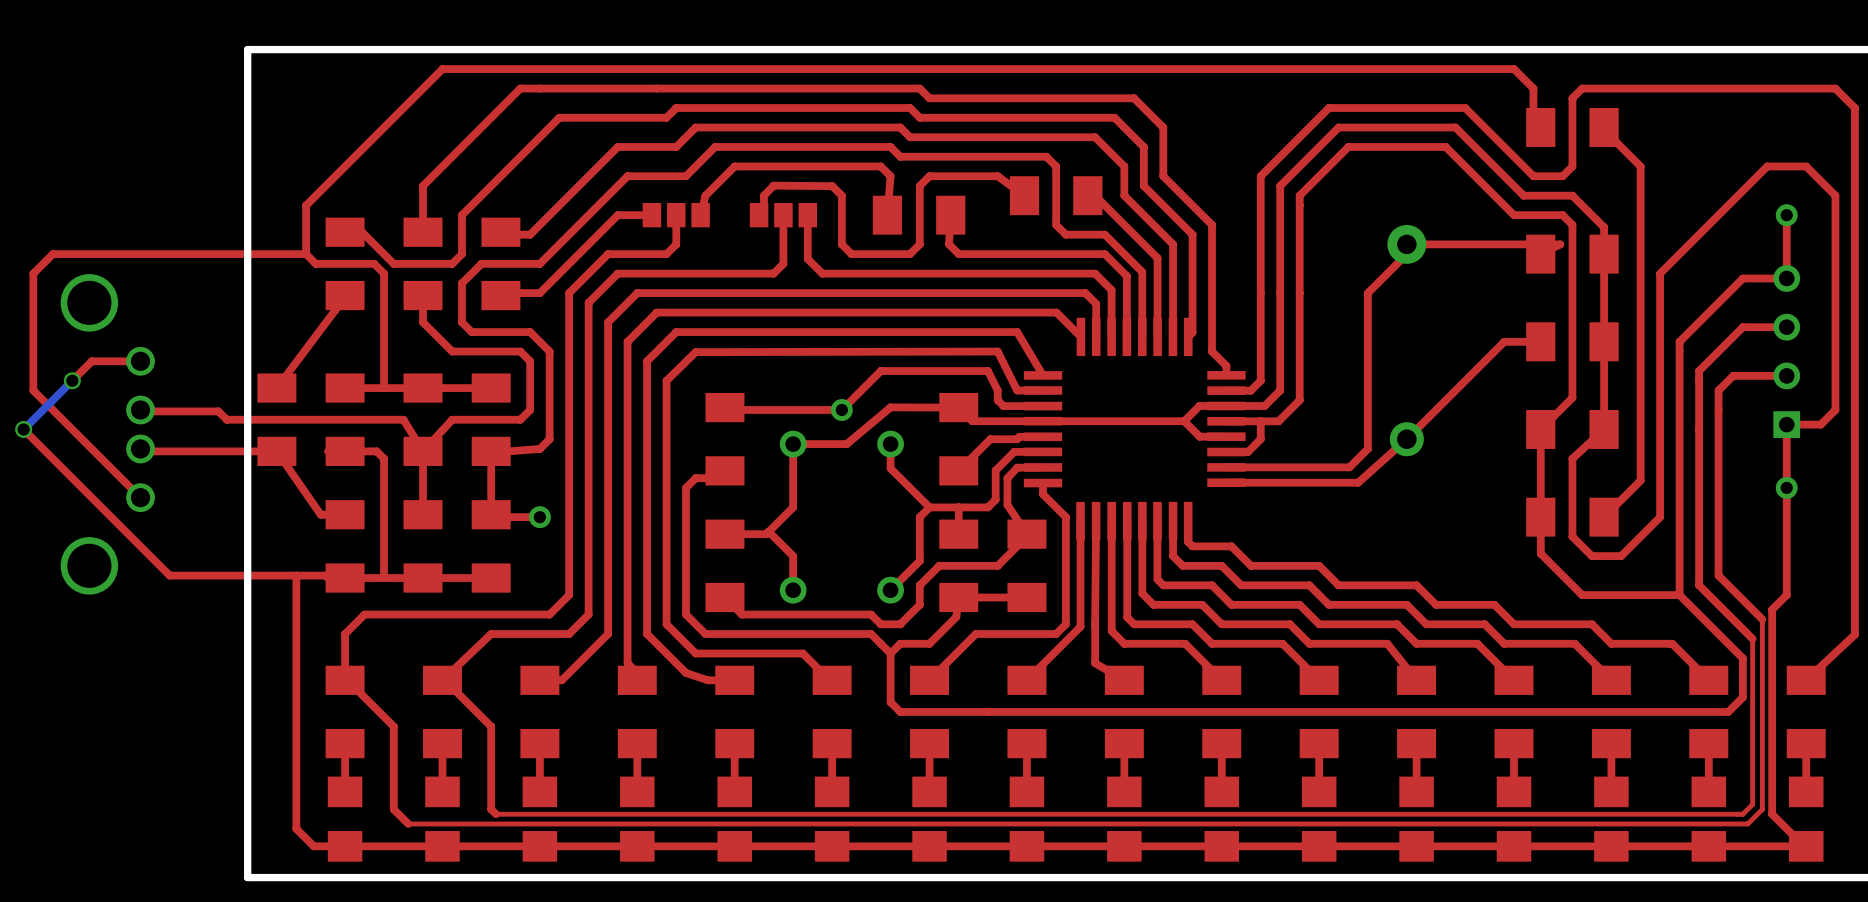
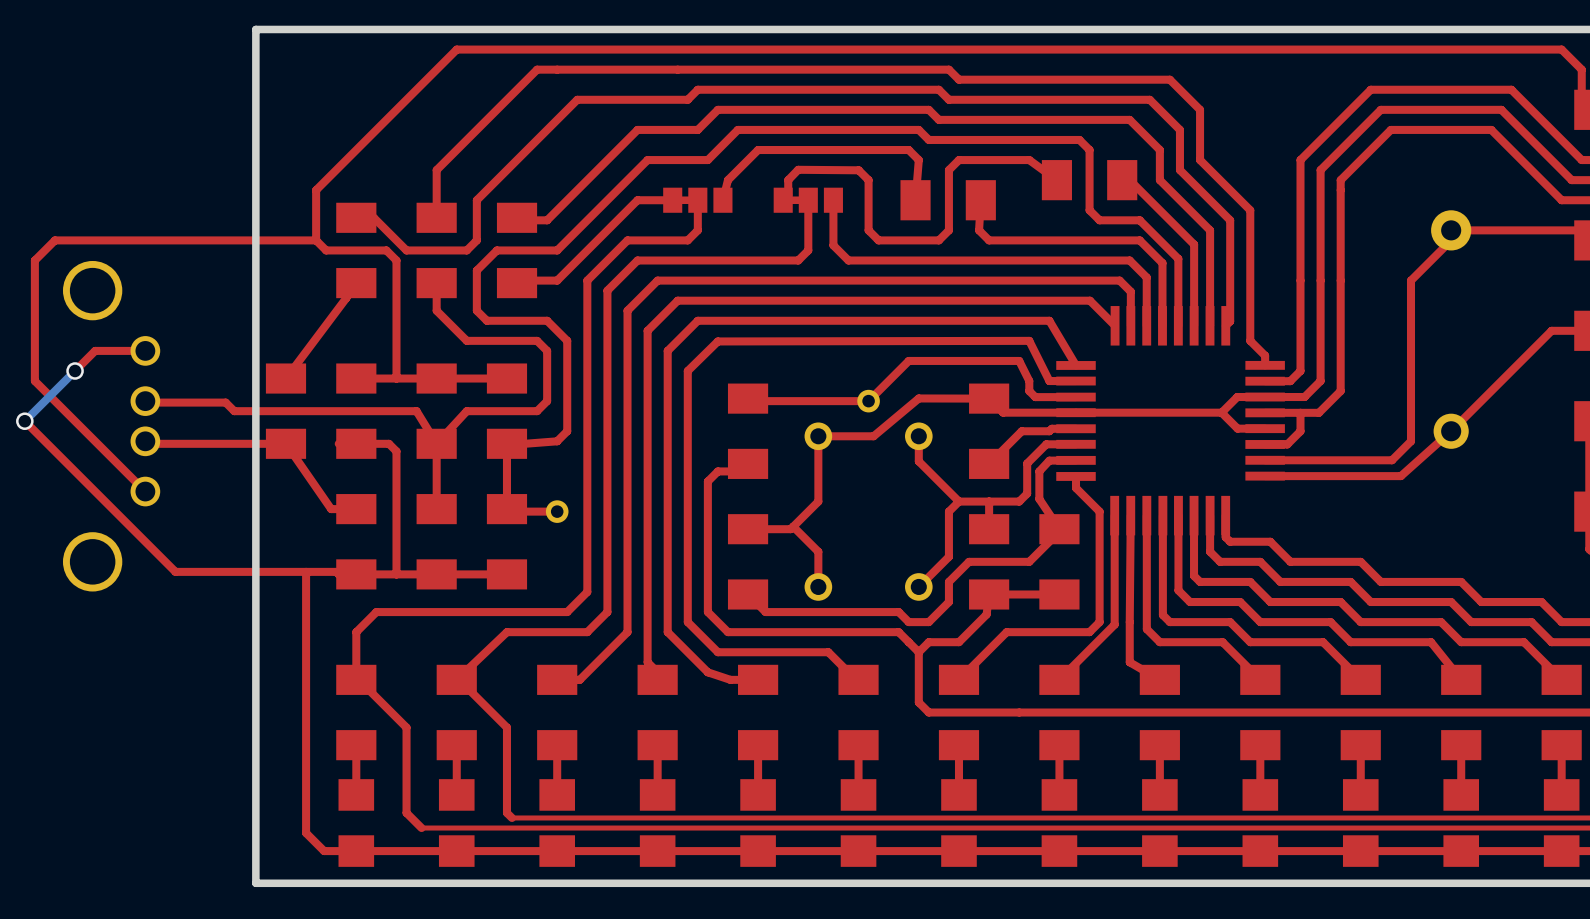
part footprint: [642, 203, 710, 228] -> [663, 187, 733, 213]
part footprint: [749, 203, 818, 228] -> [773, 187, 843, 213]

